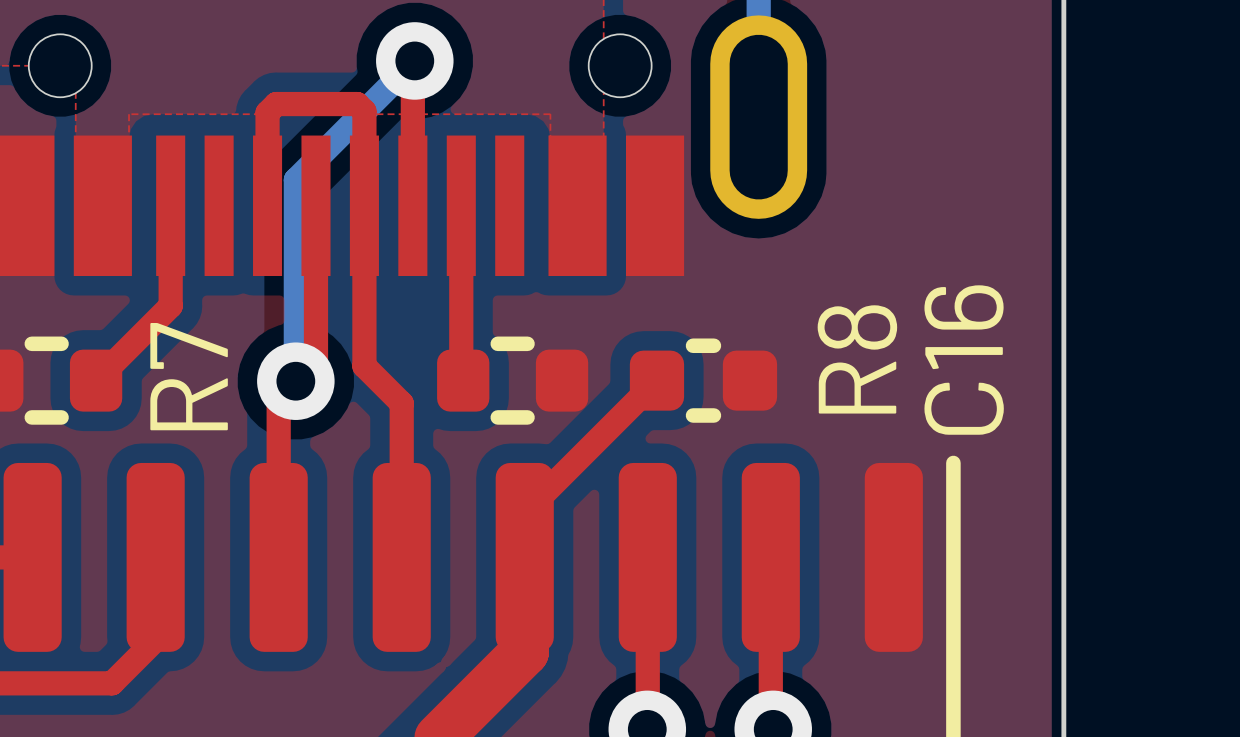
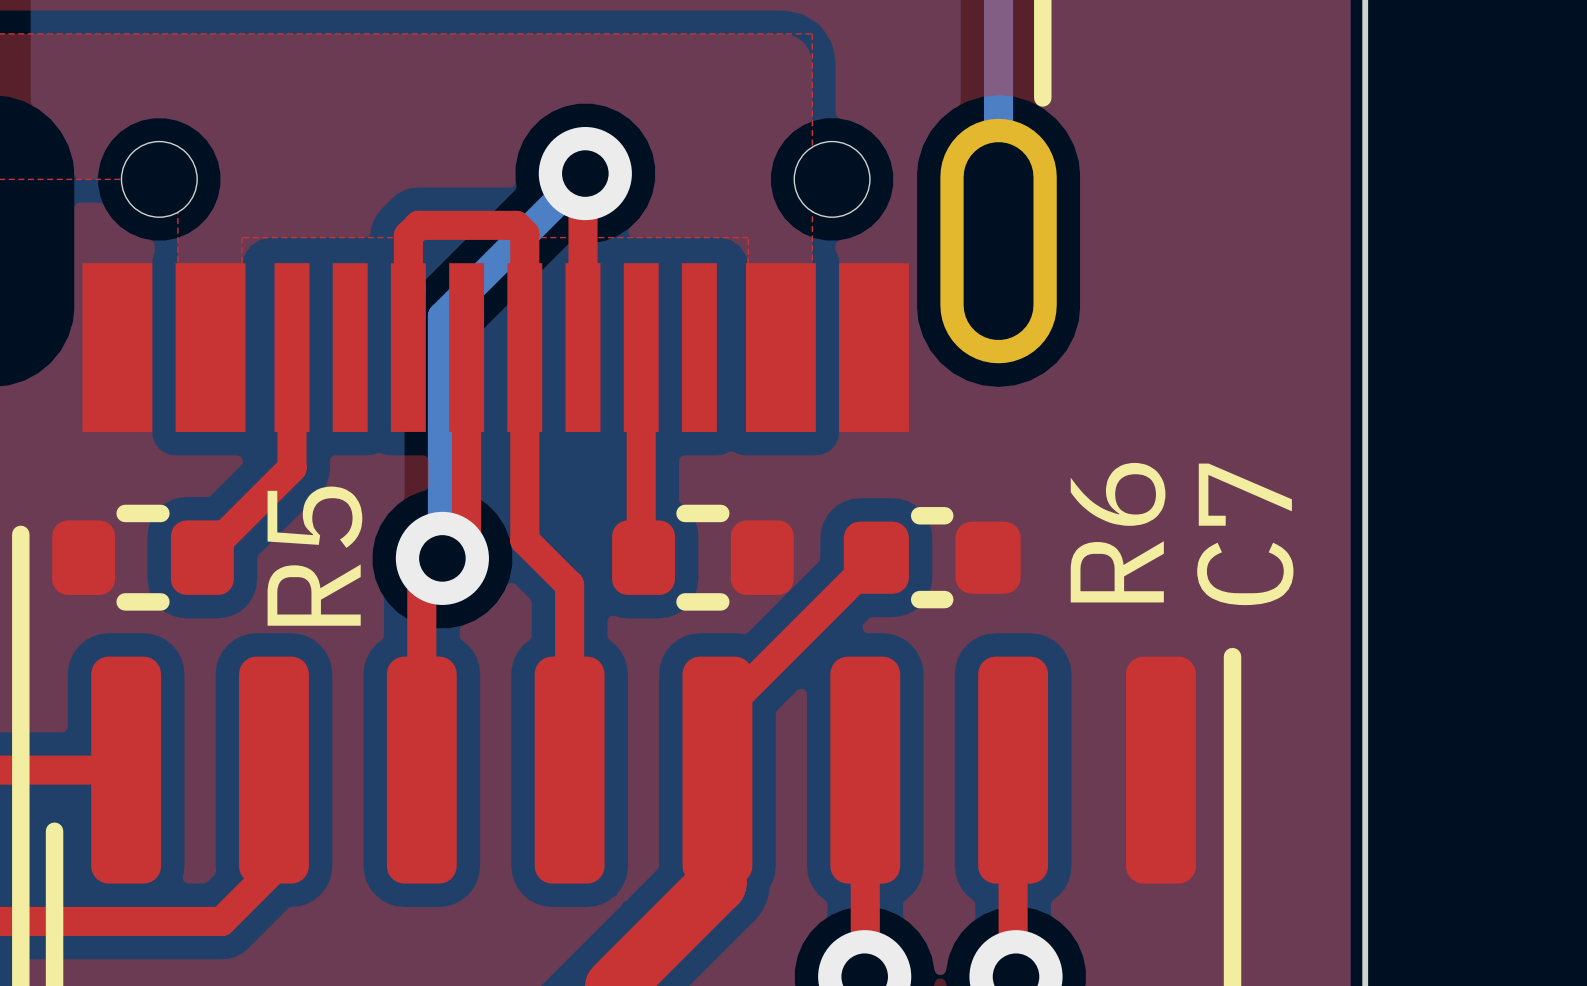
R8 name: R8 (857, 359) -> R6 (1118, 532)
C16 name: C16 (964, 360) -> C7 (1245, 534)
R7 name: R7 (189, 376) -> R5 (314, 556)

